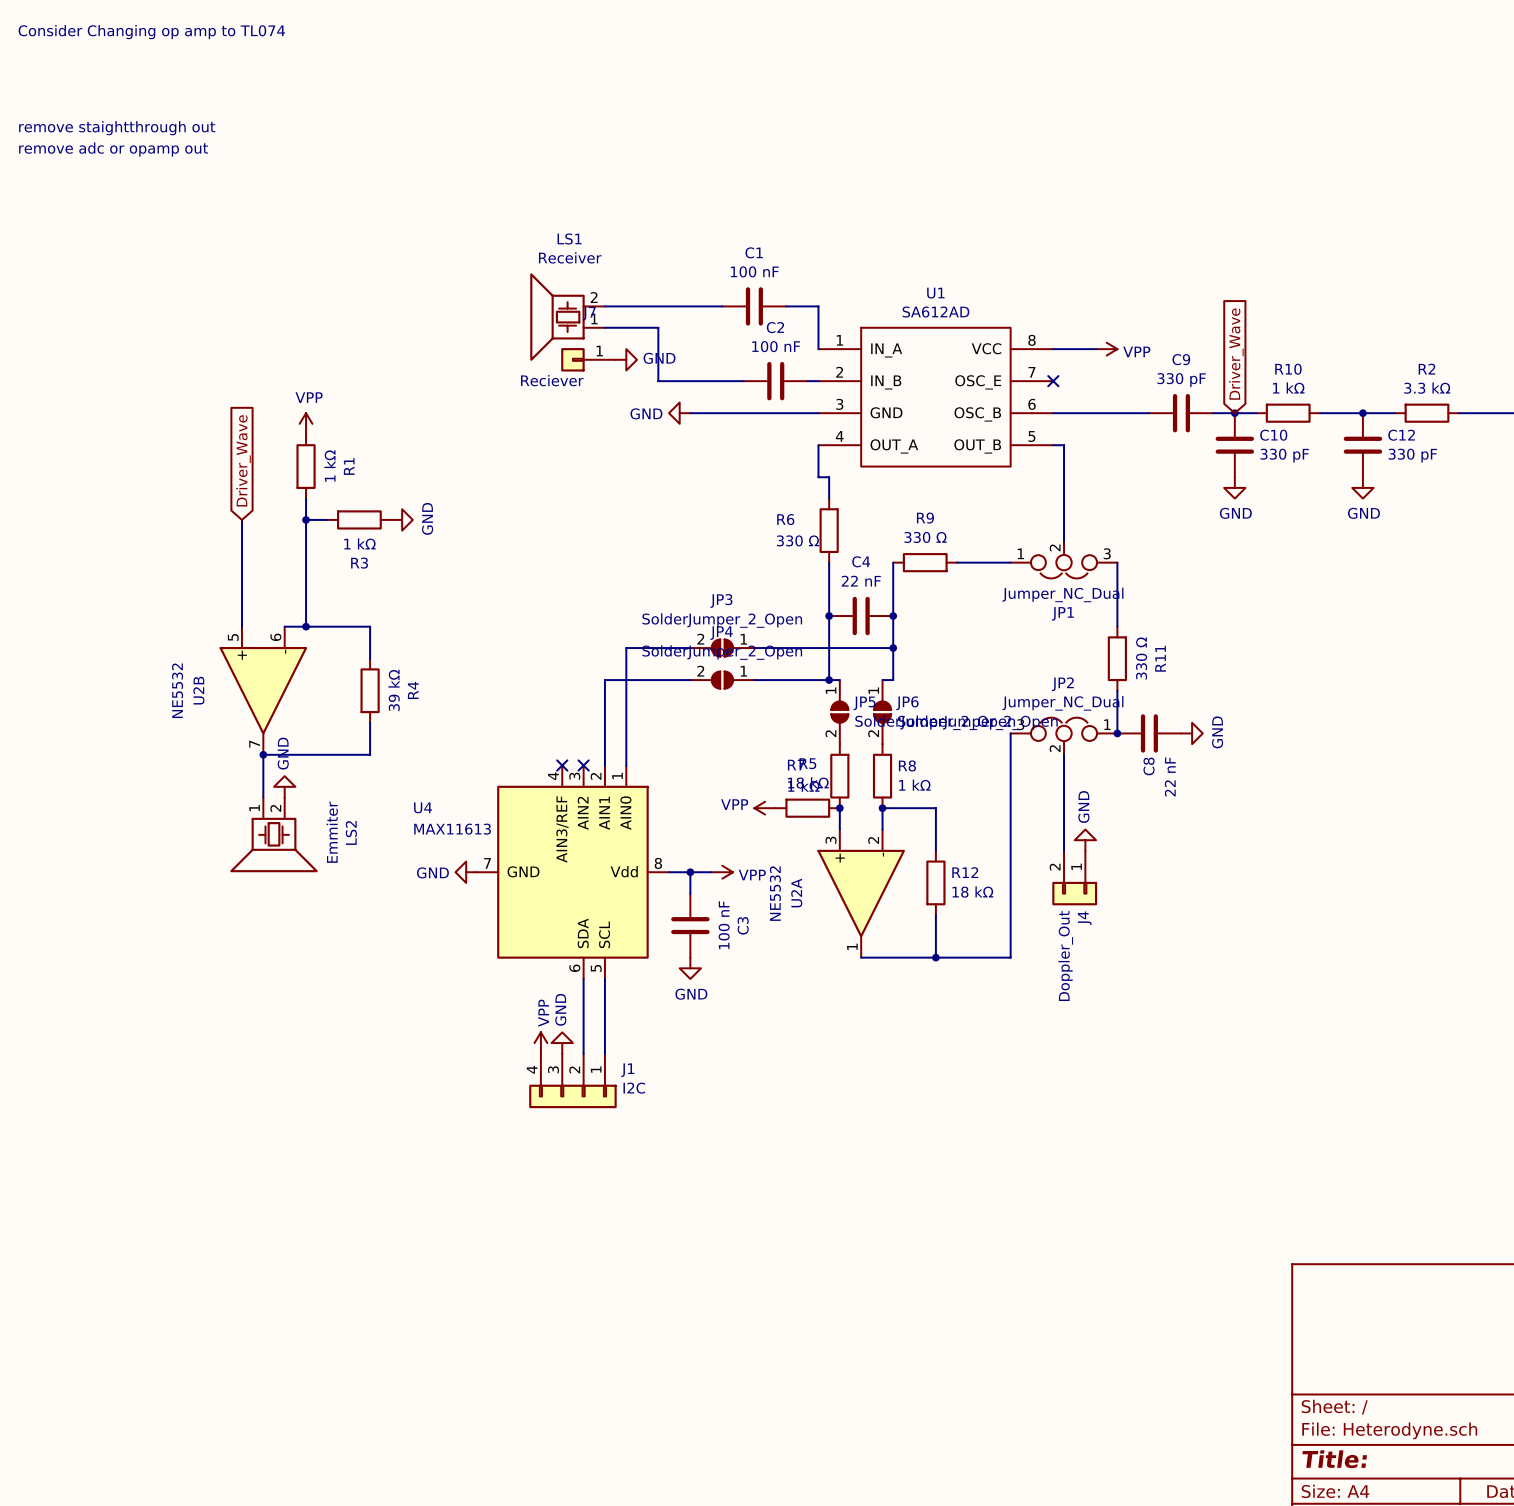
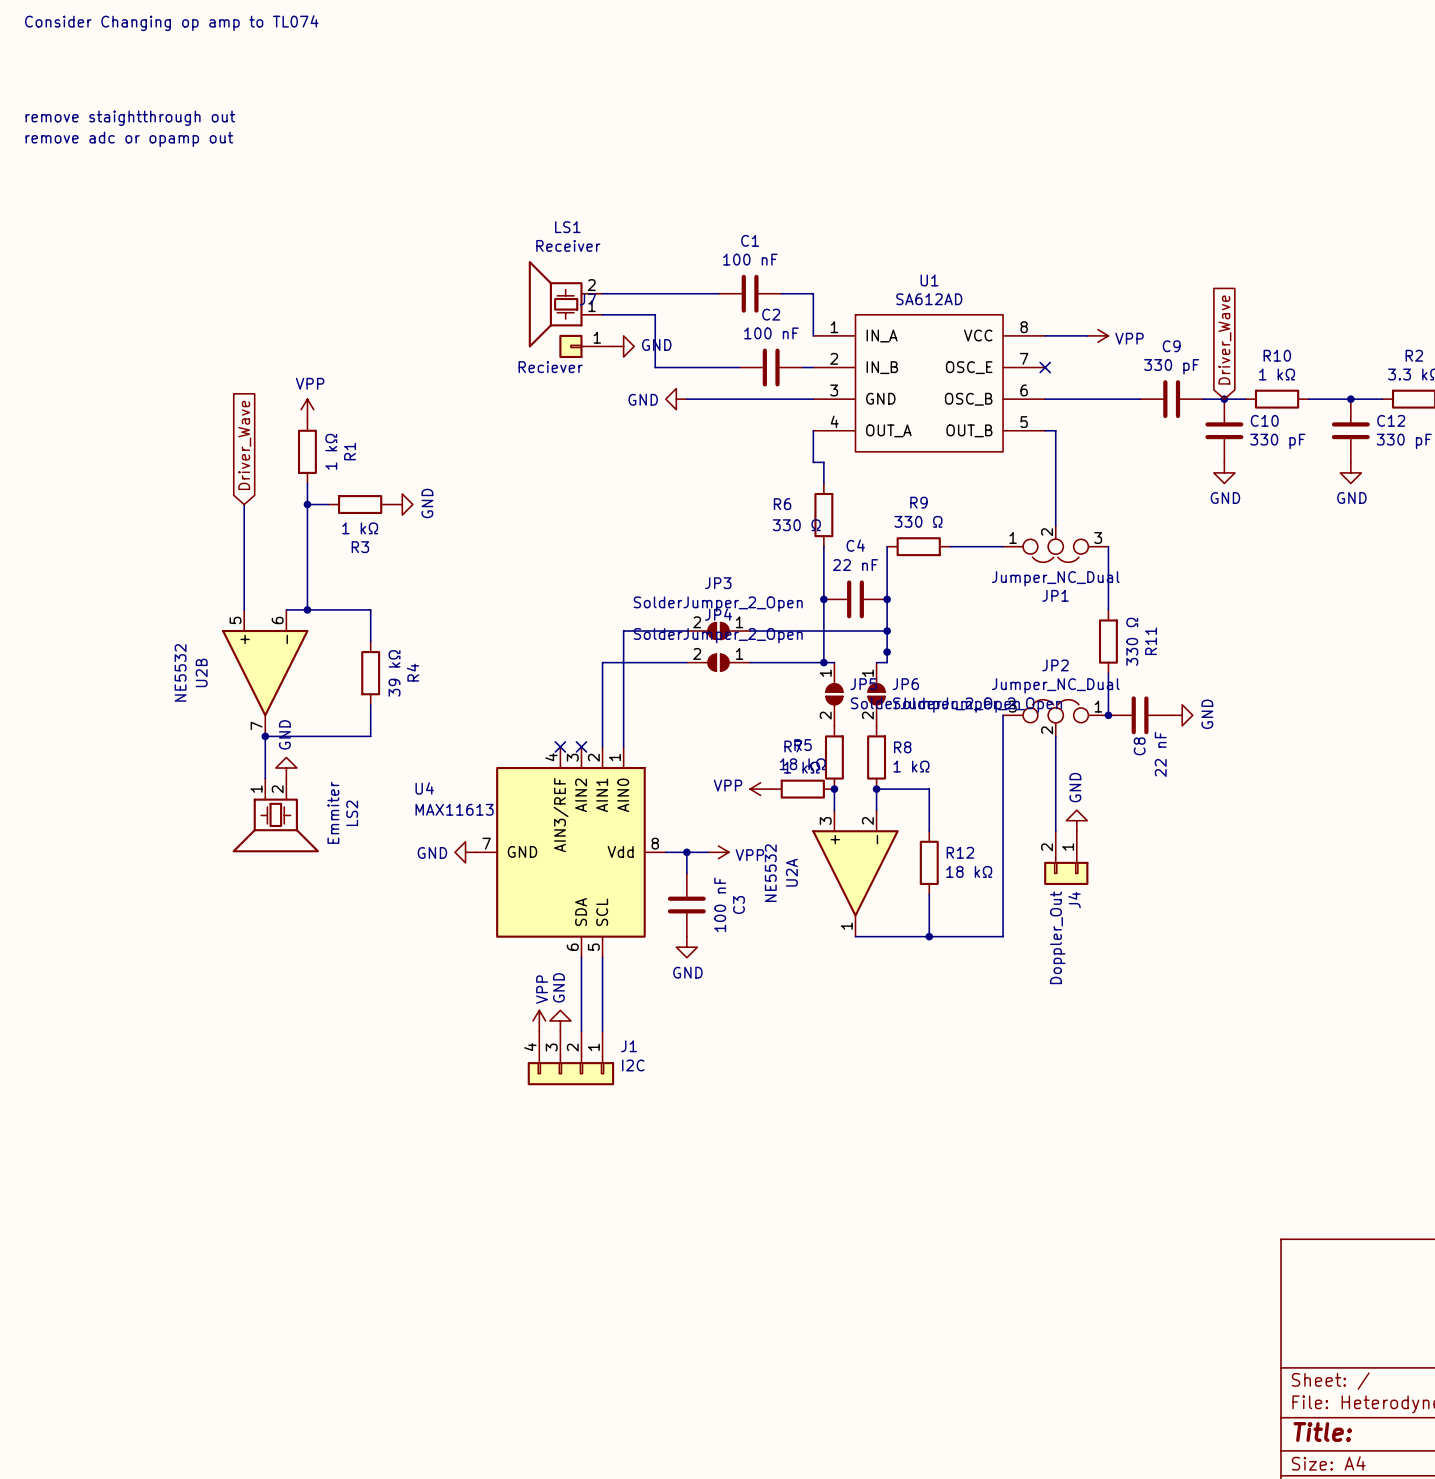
junction: none -> (887, 652)

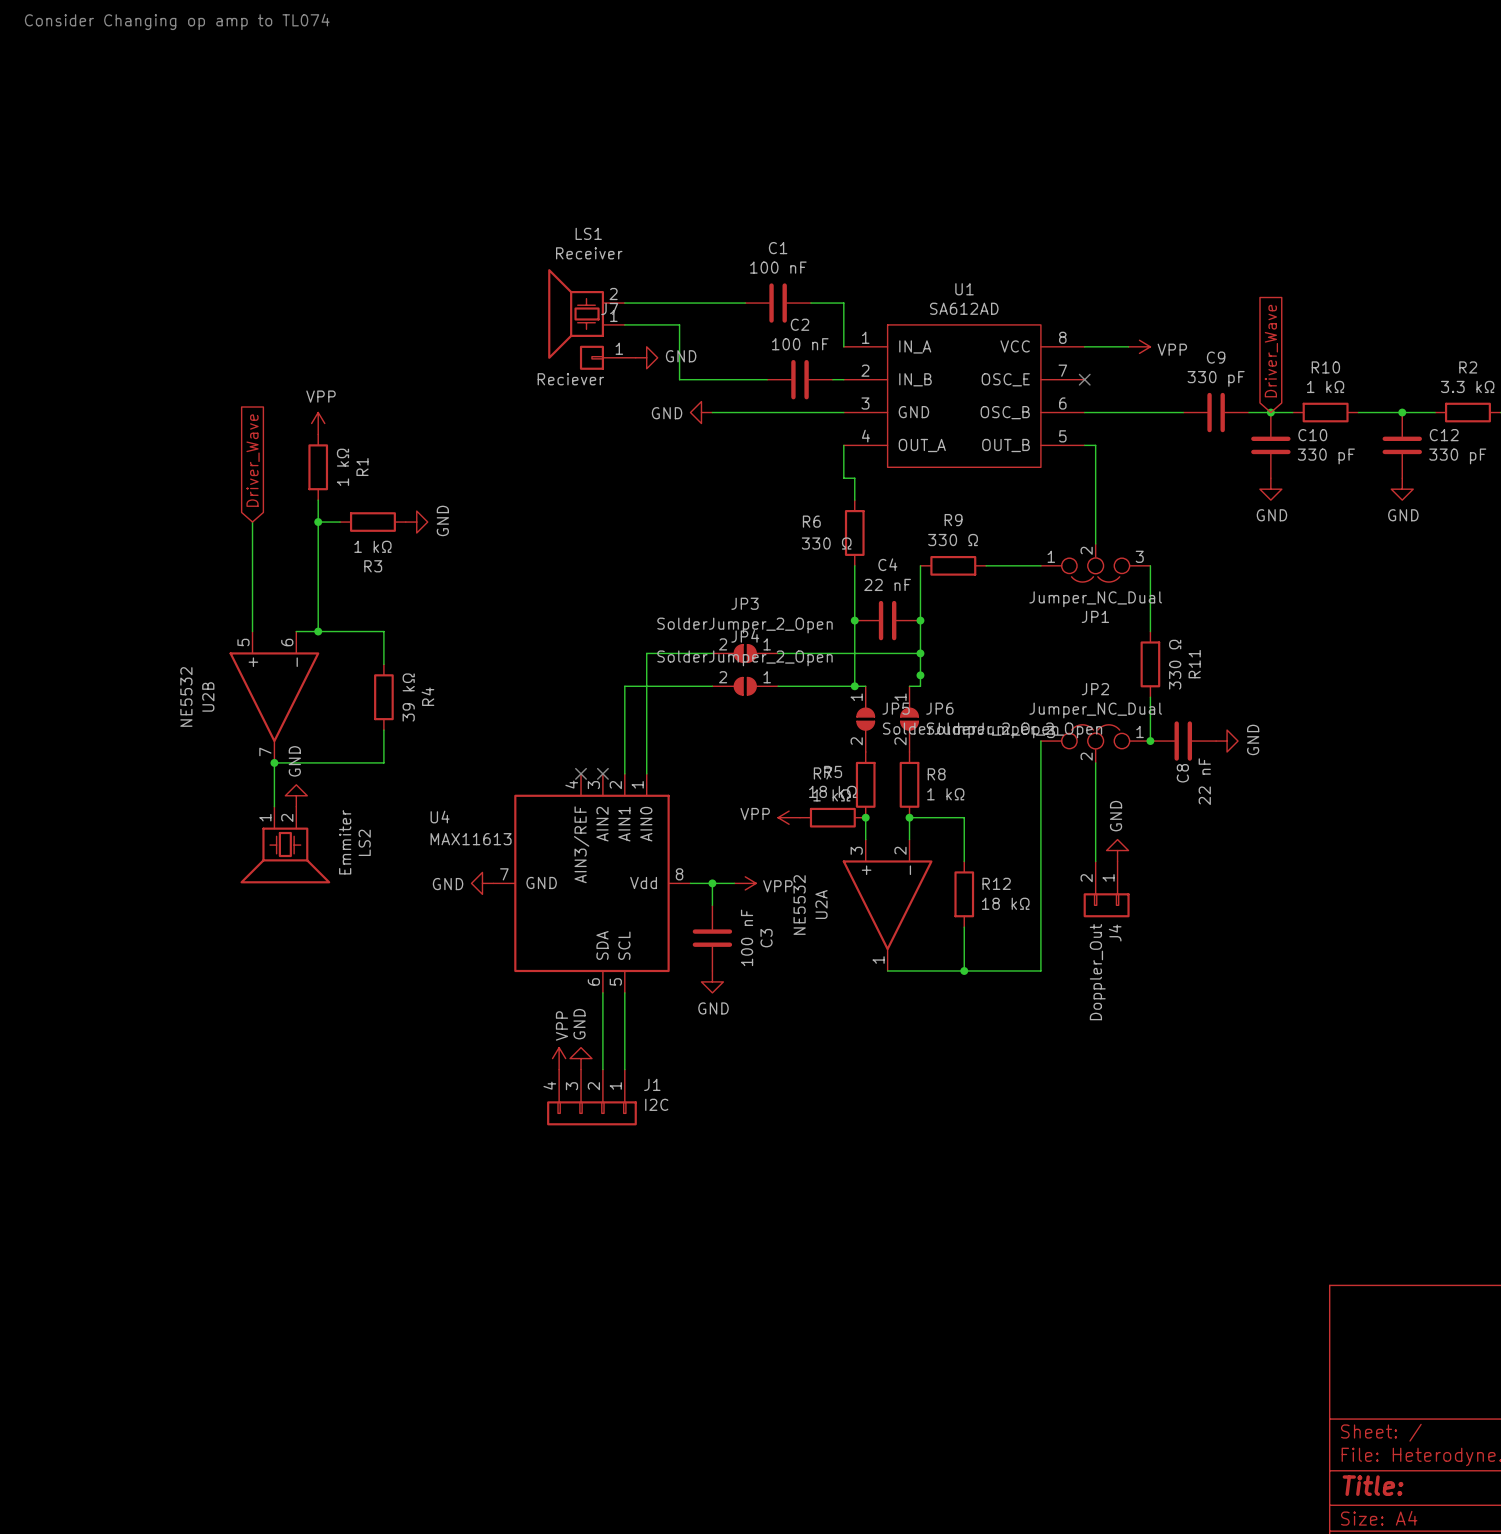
text: remove staightthrough out (130, 118) -> none
text: remove adc or opamp out (129, 139) -> none

